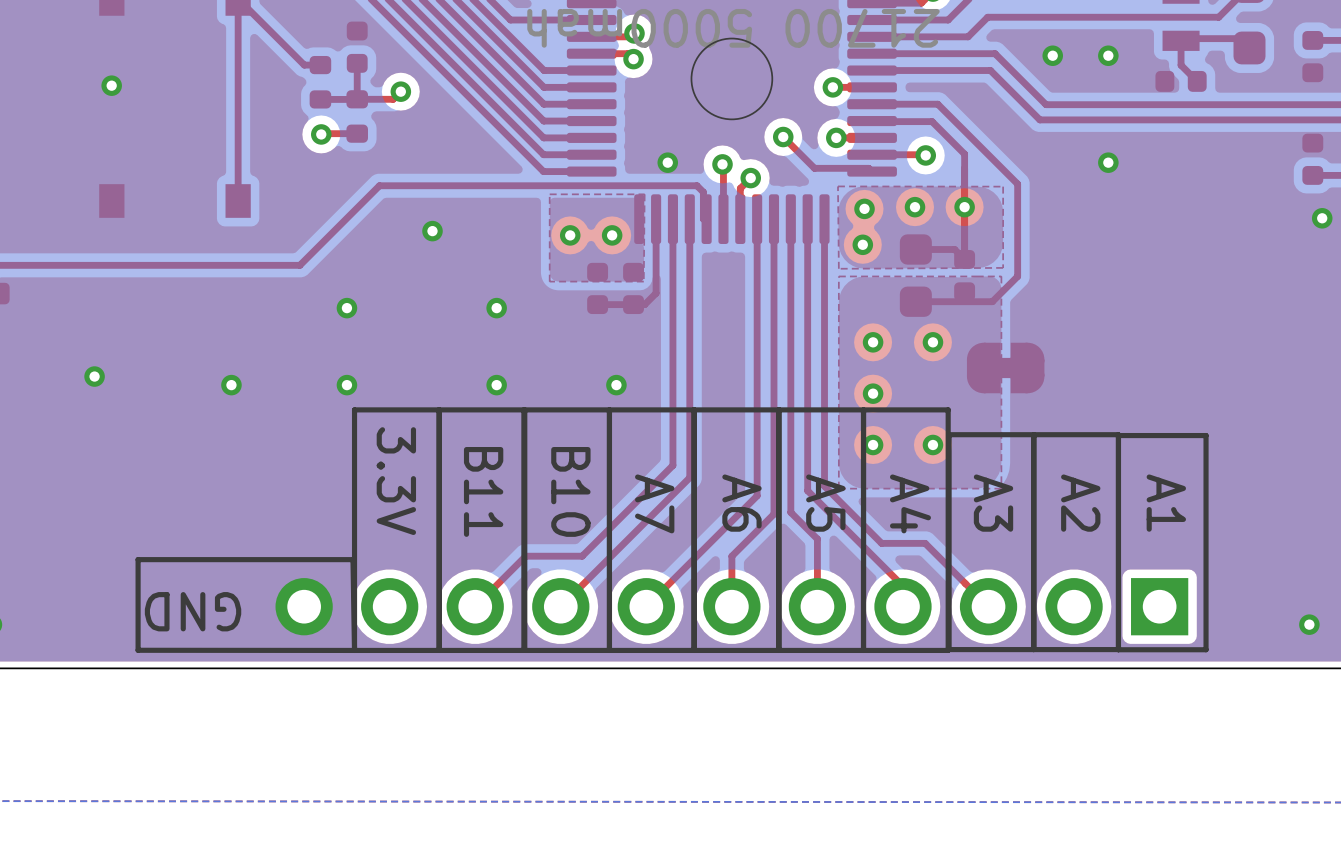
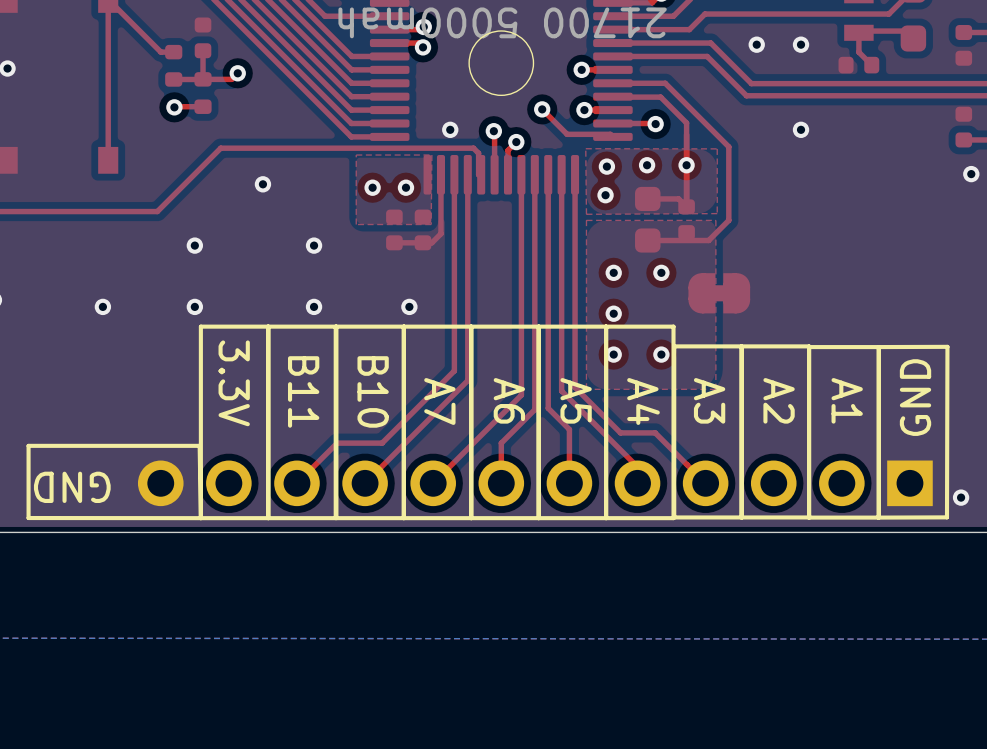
line: none -> (878, 347) (947, 346) (946, 517) (878, 517)
text: none -> GND (915, 397)
part: (731, 606) -> none
part: none -> (535, 483)

